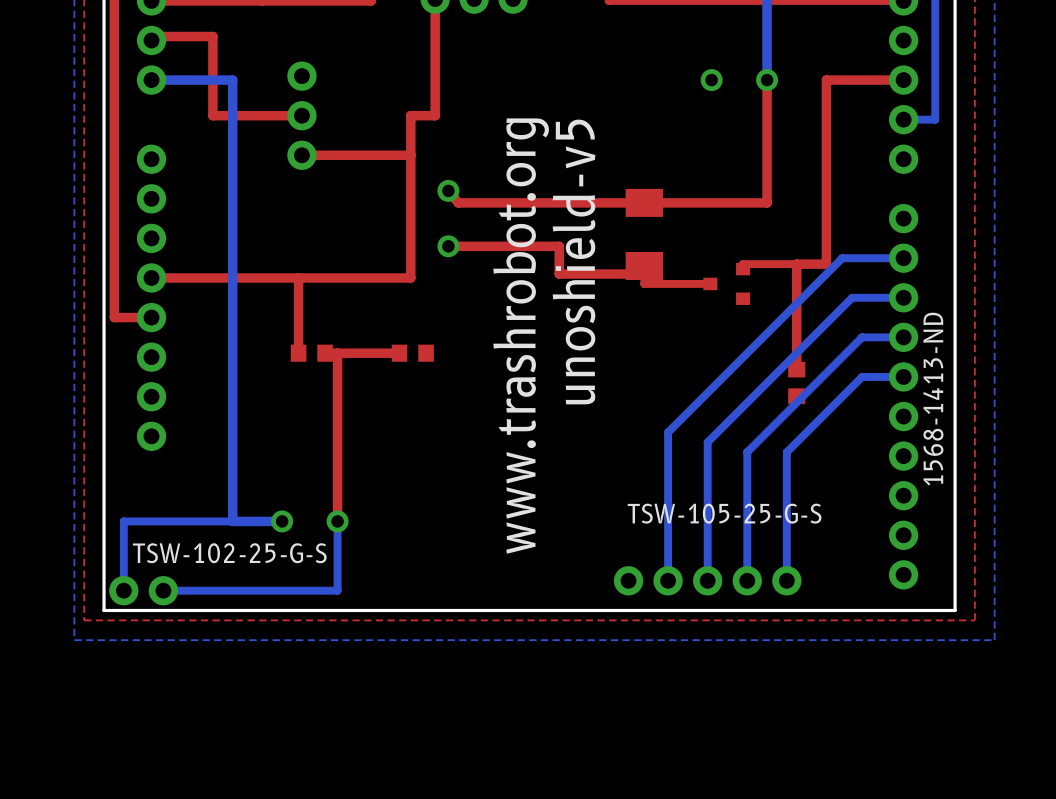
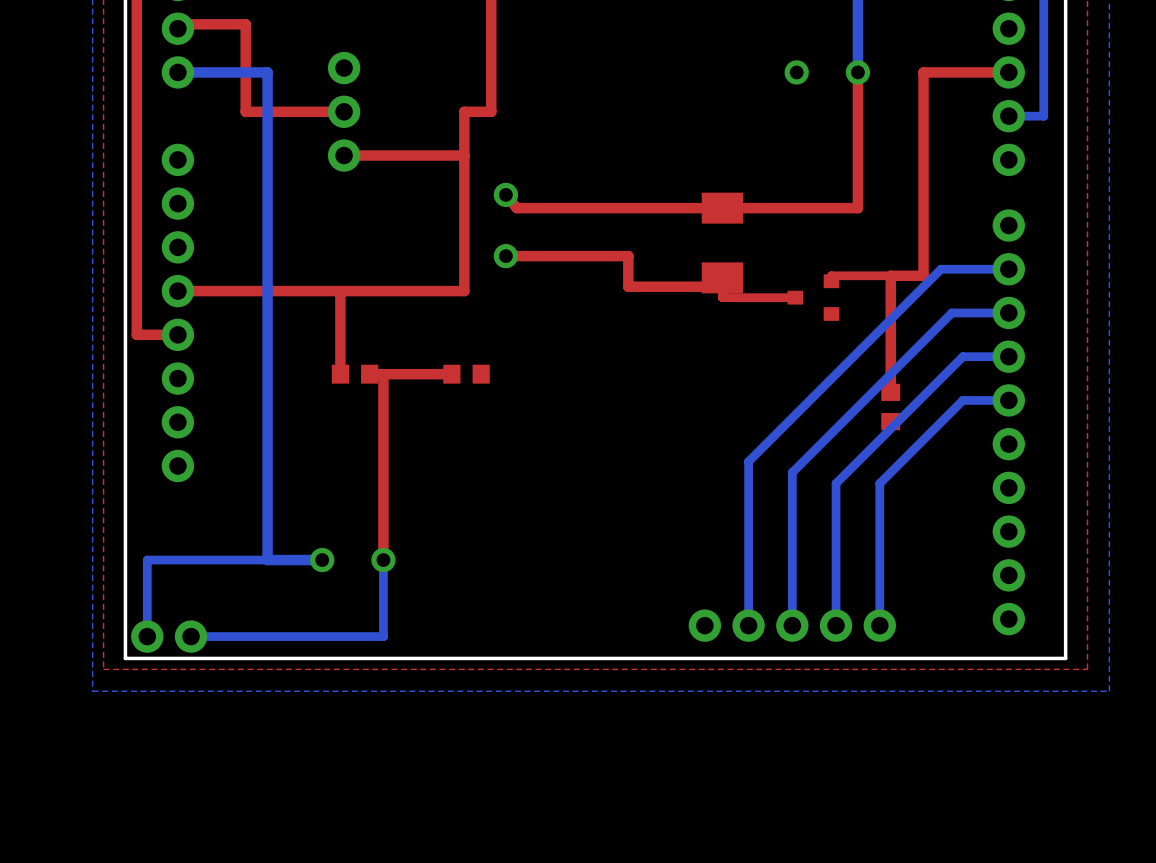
text: unoshield-v5 (574, 261) -> none
text: www.trashrobot.org (521, 336) -> none
text: 1568-1413-ND (933, 399) -> none
text: TSW-105-25-G-S (724, 513) -> none
text: TSW-102-25-G-S (229, 553) -> none

